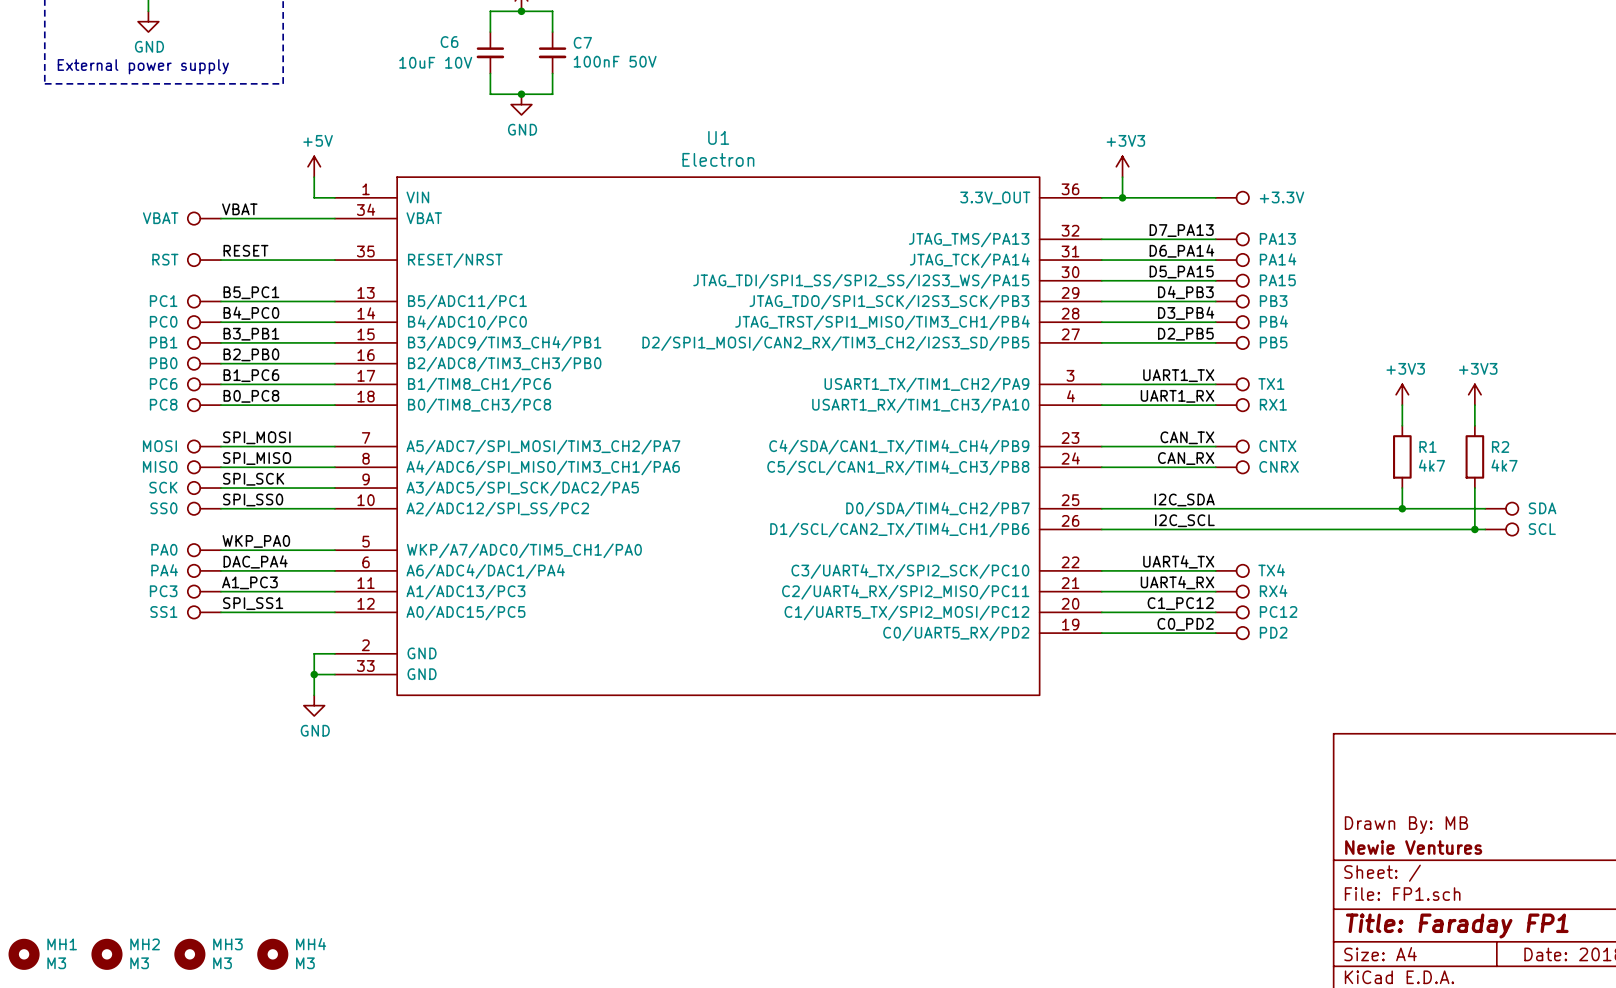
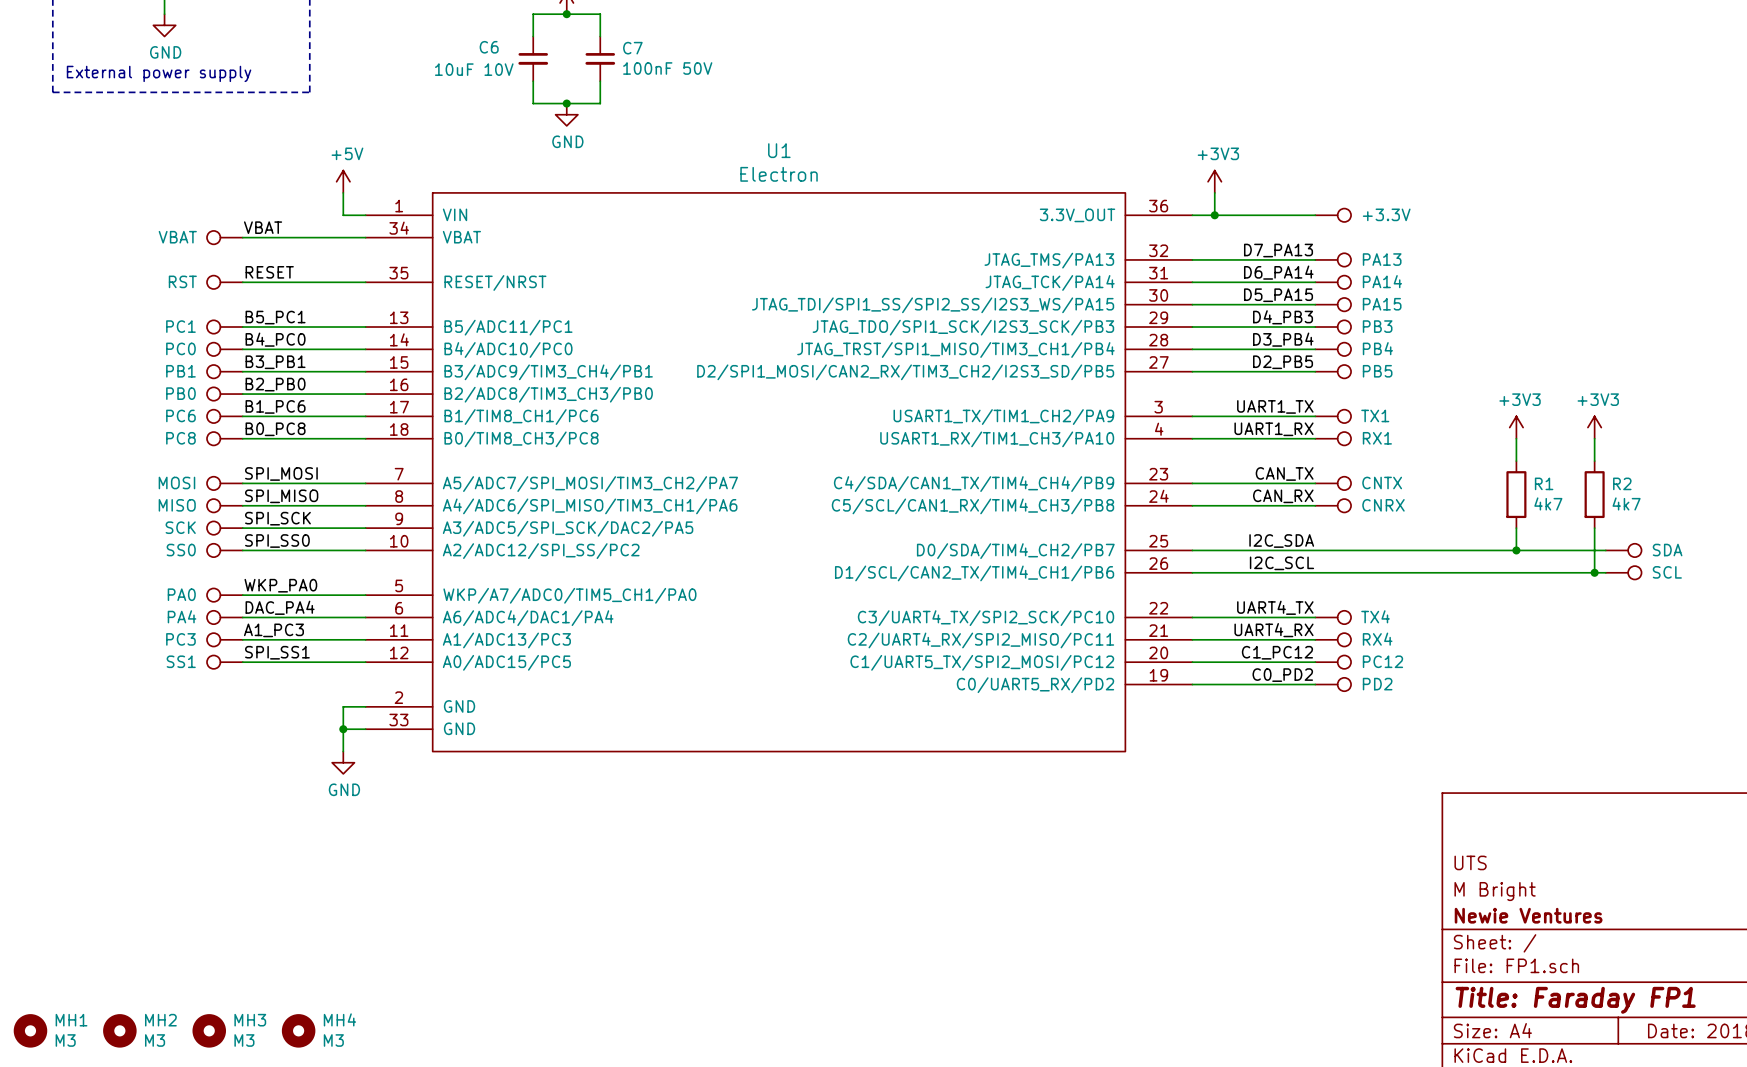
title block: none -> UTS (1470, 862)
title block: Drawn By: MB (1406, 825) -> M Bright (1495, 891)

